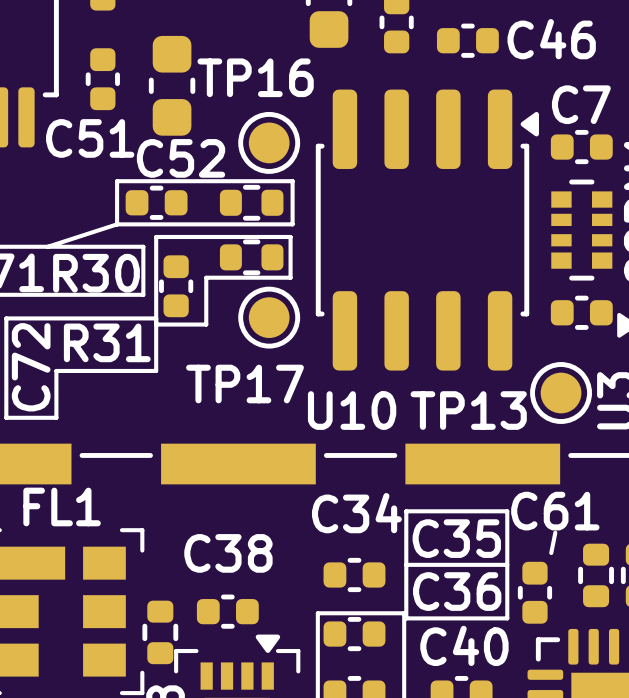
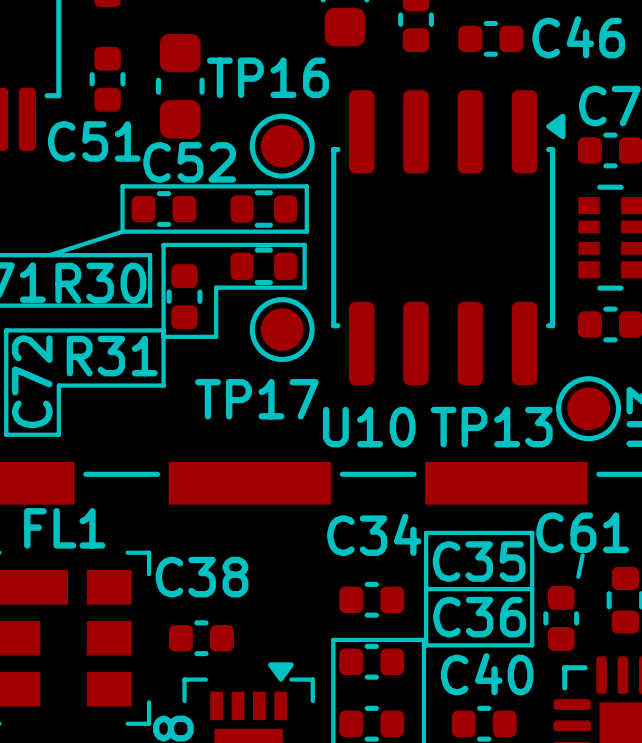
C38 position: (227, 611) -> (201, 638)
part: (160, 632) -> none

